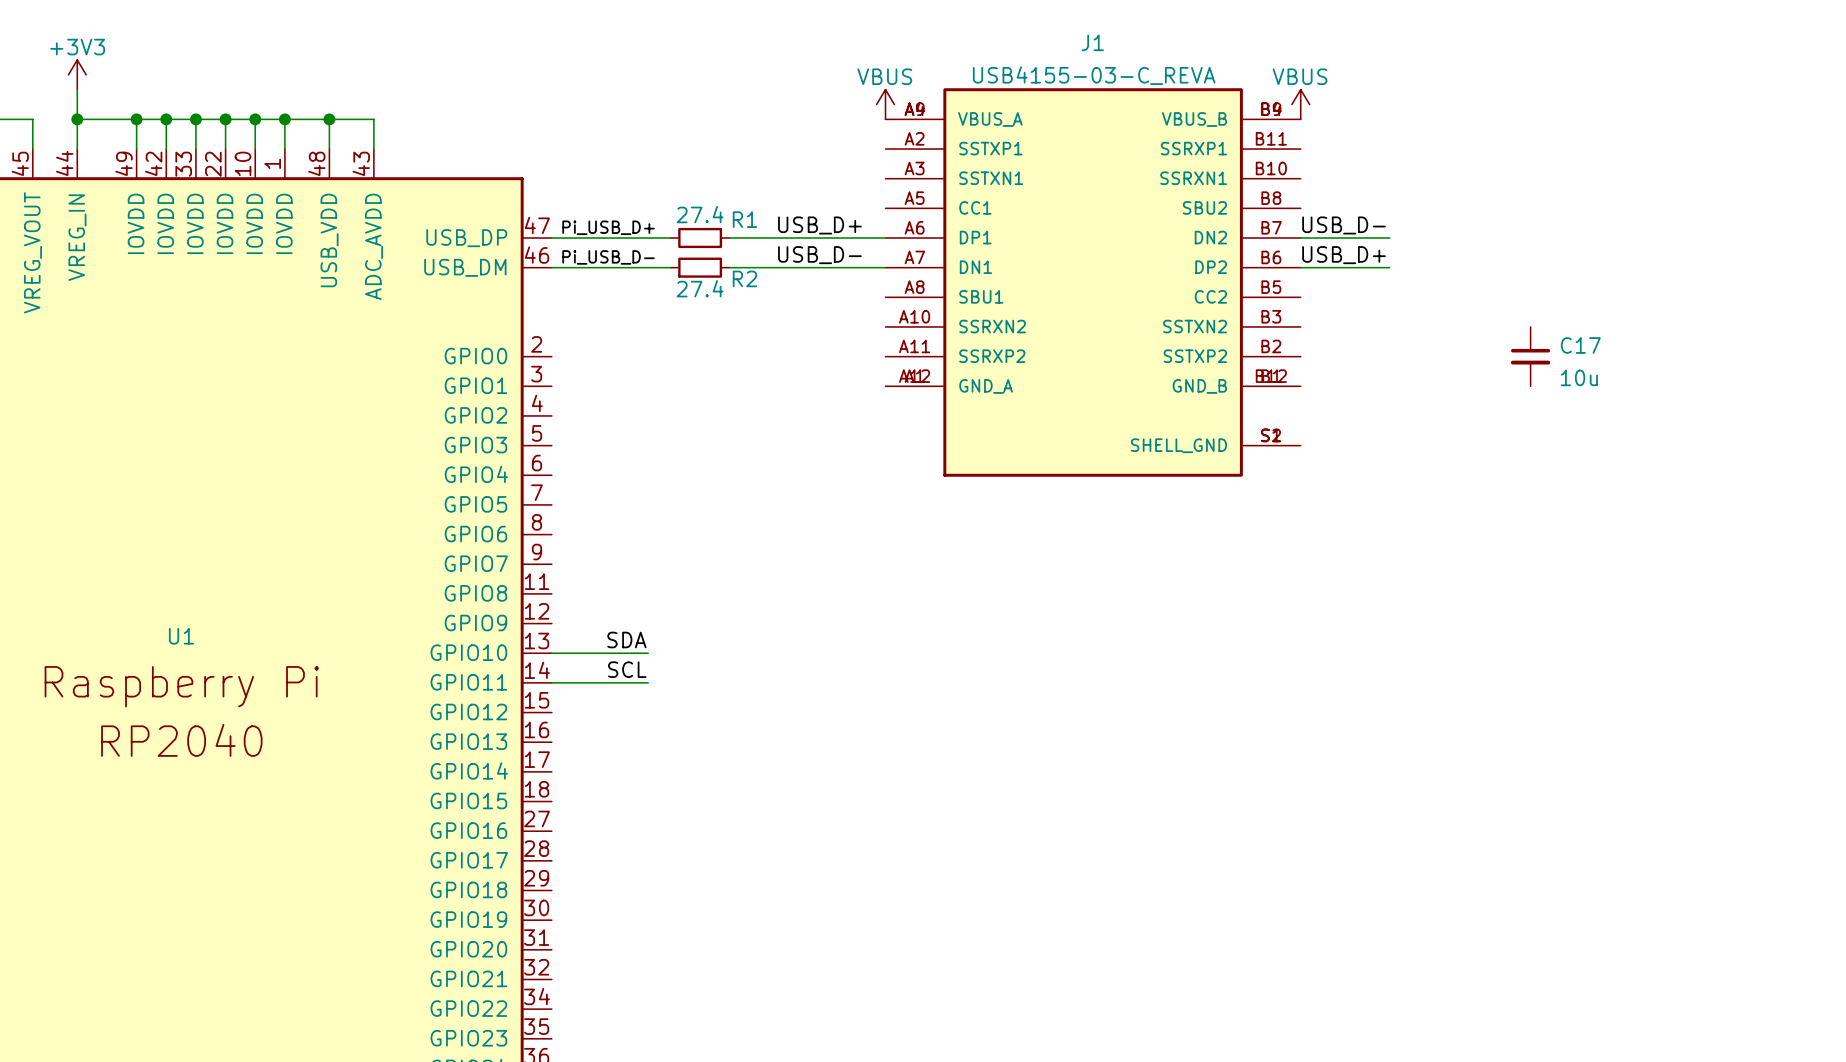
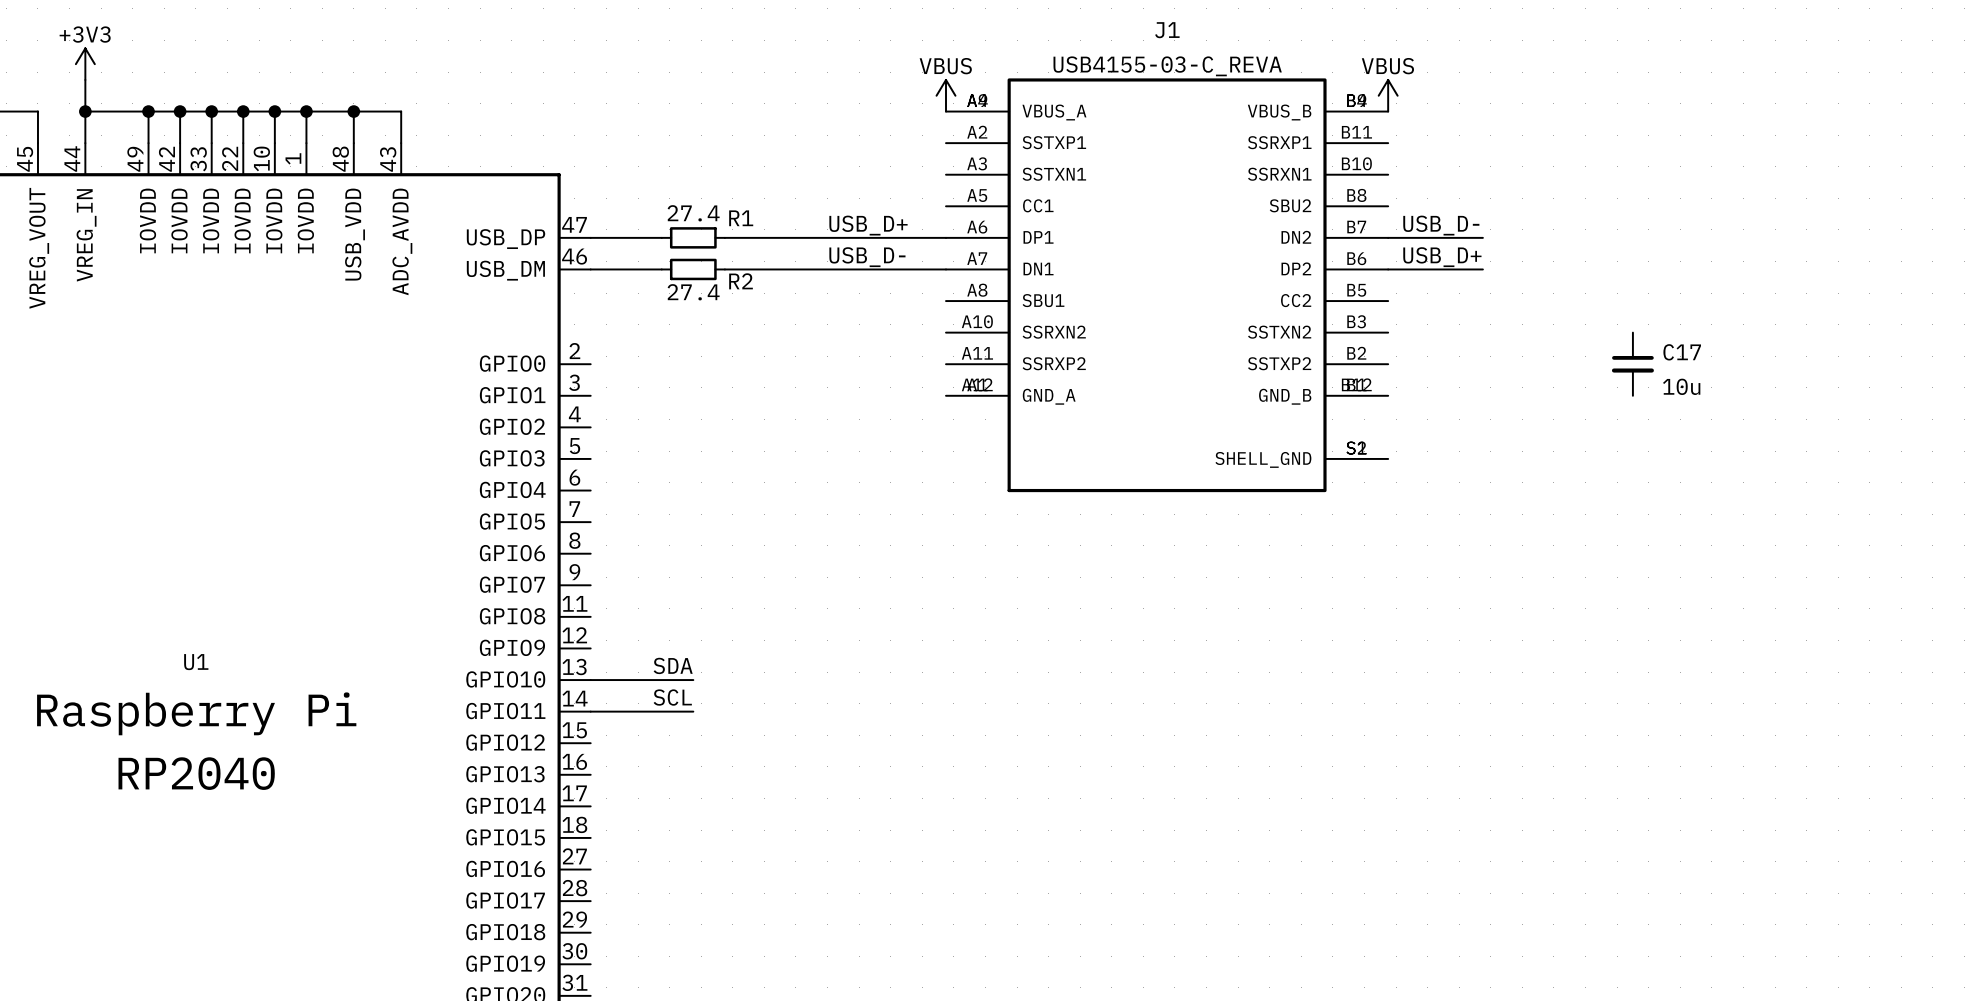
label: Pi_USB_D+ (608, 227) -> none
wire: (618, 238) (670, 238) -> (724, 237) (780, 237)
R1 position: (700, 238) -> (693, 237)
label: Pi_USB_D- (608, 257) -> none
wire: (618, 267) (670, 267) -> (724, 269) (780, 269)
R2 position: (700, 267) -> (693, 269)

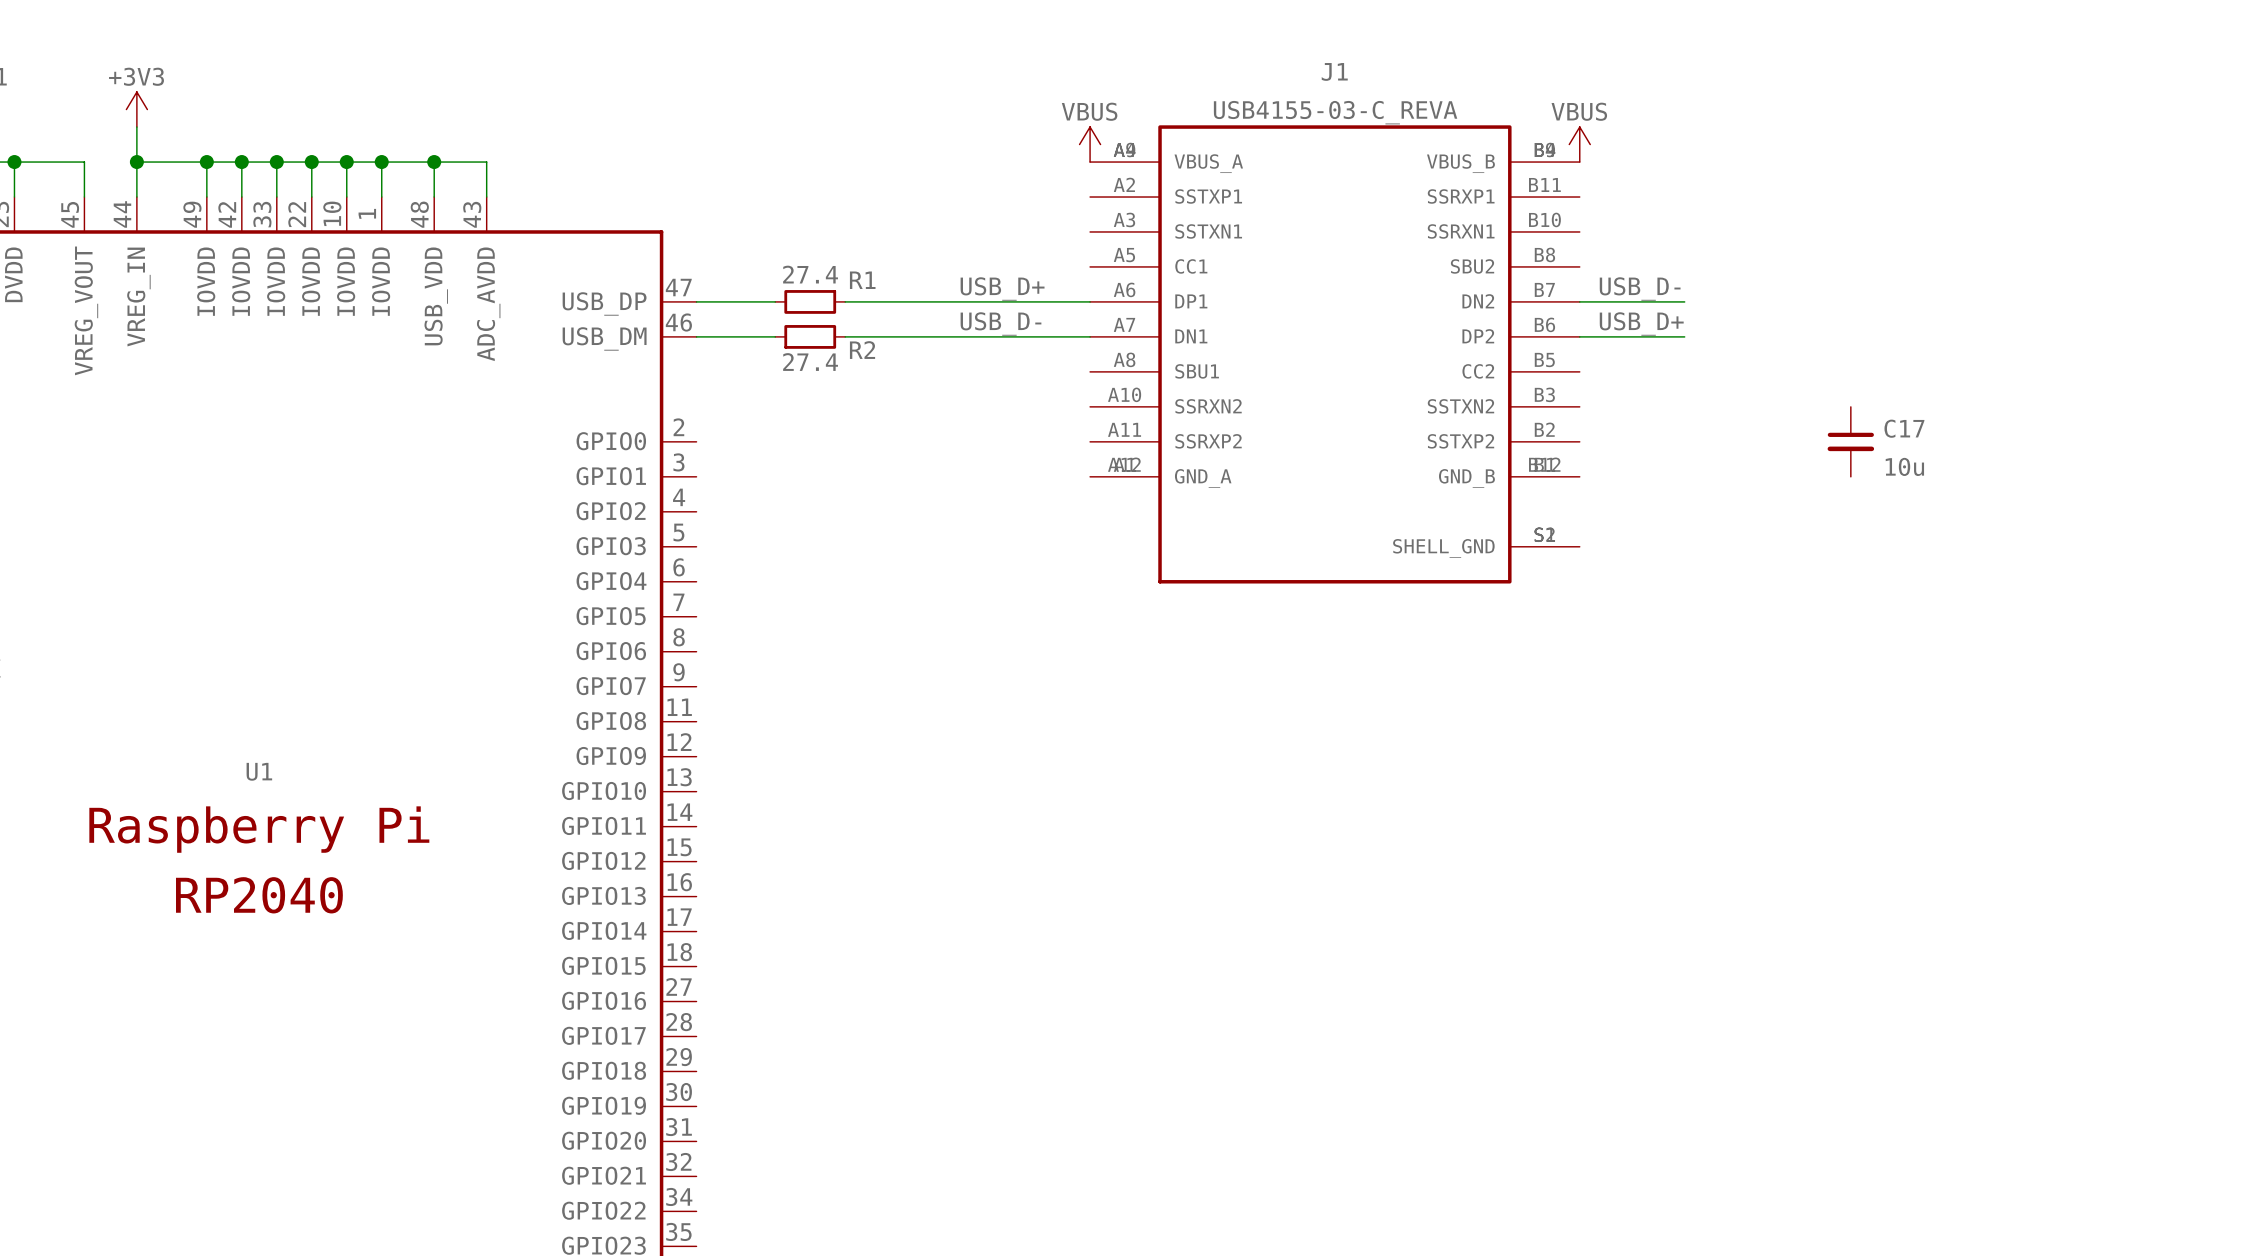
label: SDA (673, 665) -> none
wire: (590, 680) (693, 680) -> none
label: SCL (672, 697) -> none
wire: (590, 711) (693, 711) -> none

